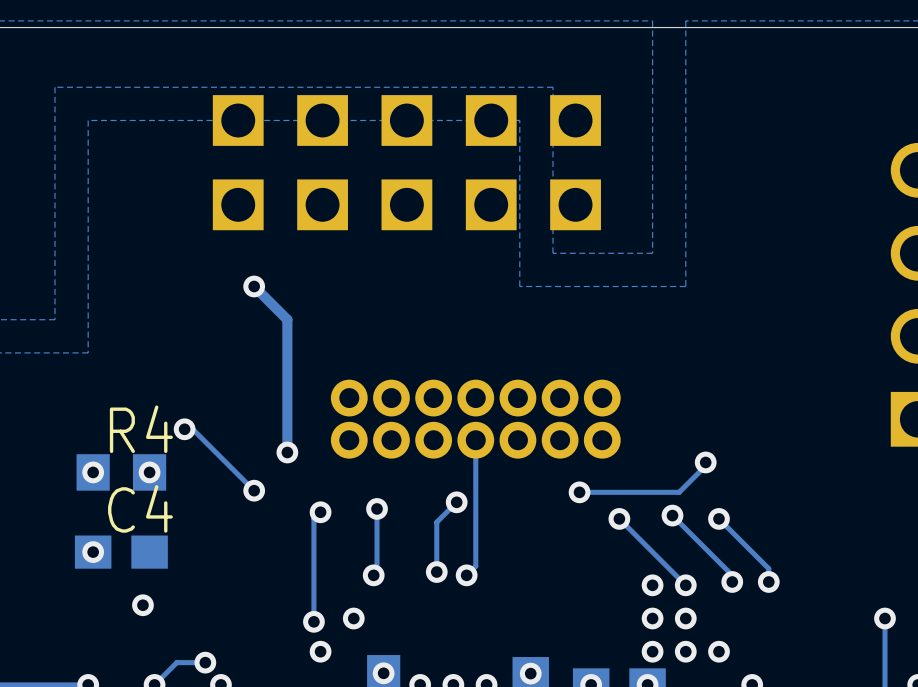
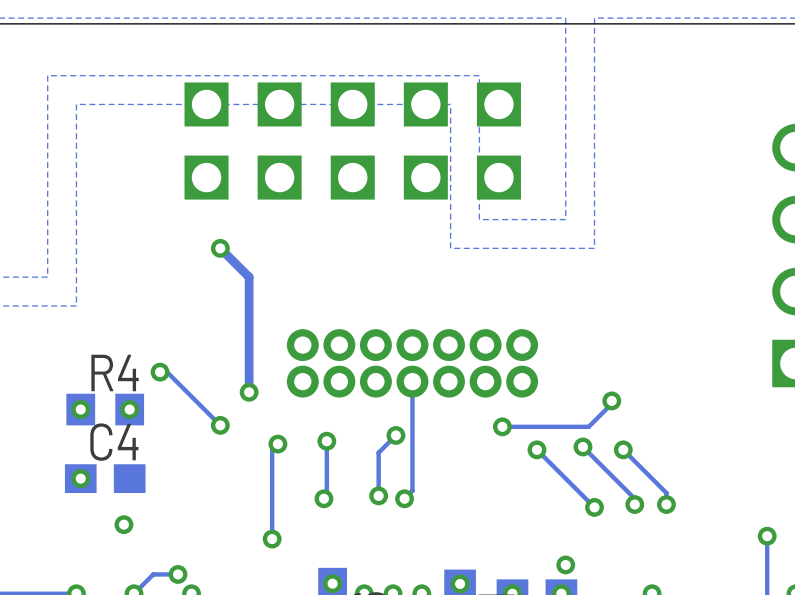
via: (652, 585) -> none
via: (353, 618) -> none
via: (652, 618) -> none
via: (685, 618) -> none
via: (320, 651) -> none
via: (685, 651) -> none
via: (718, 651) -> none

